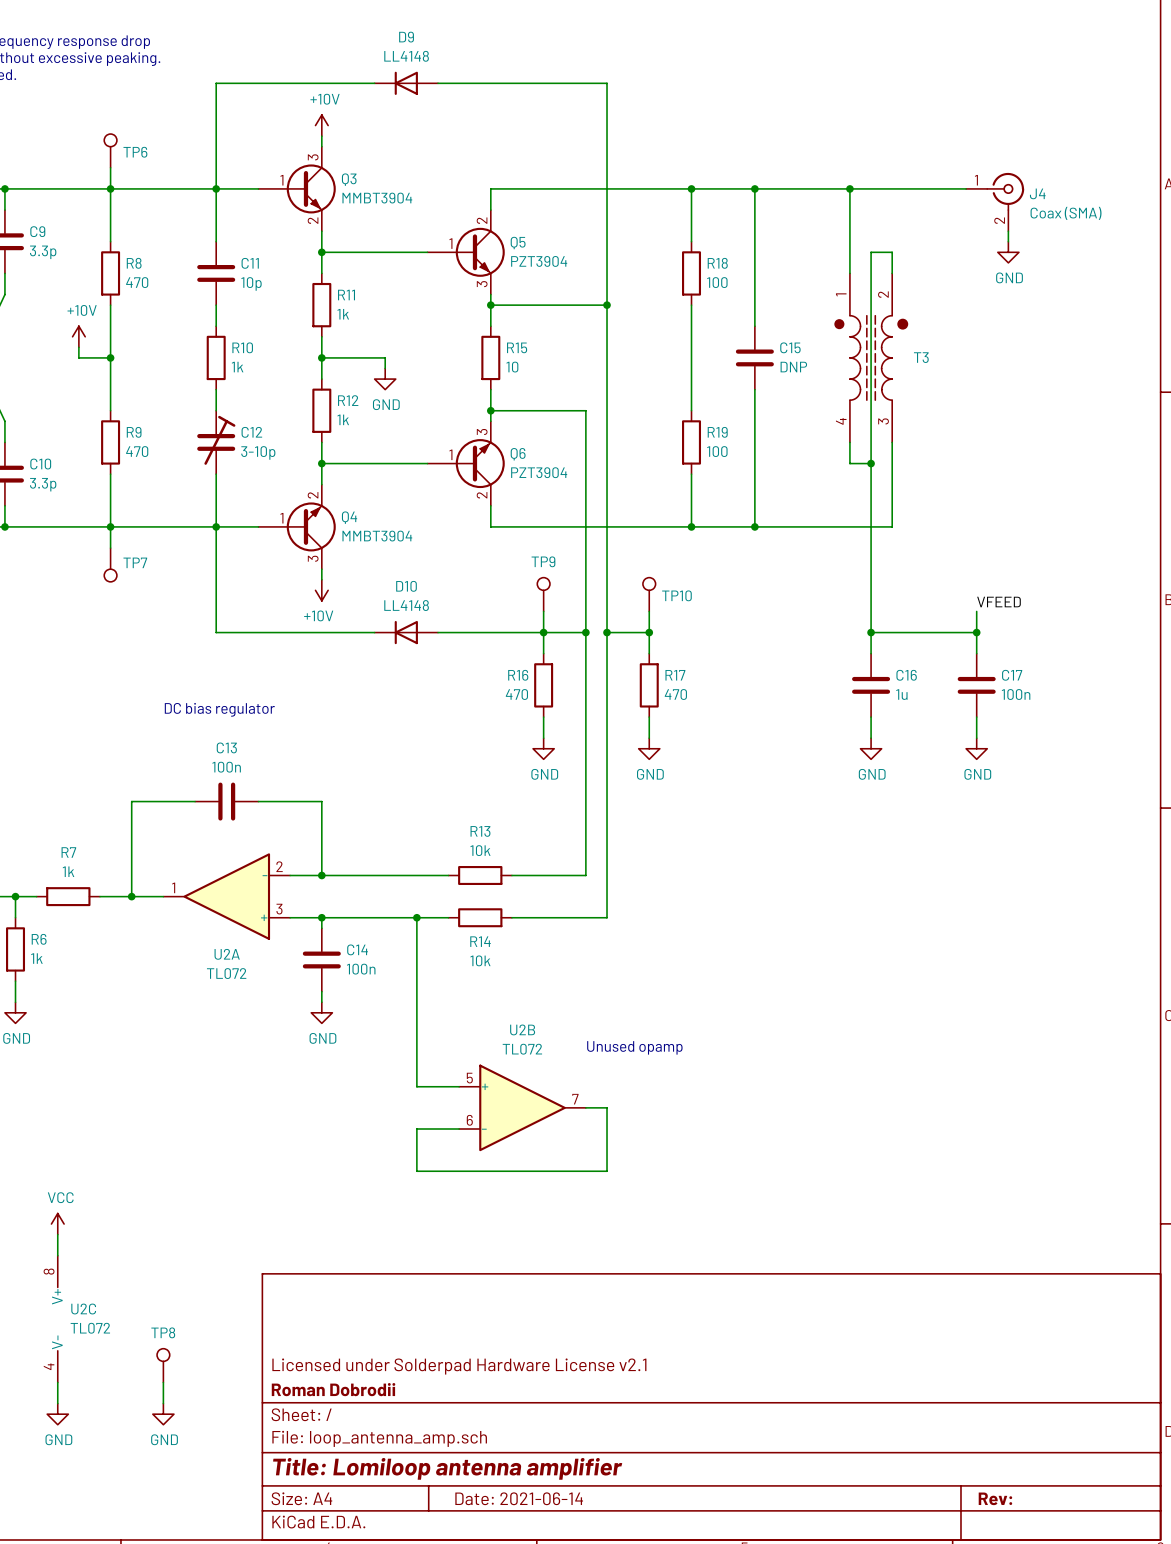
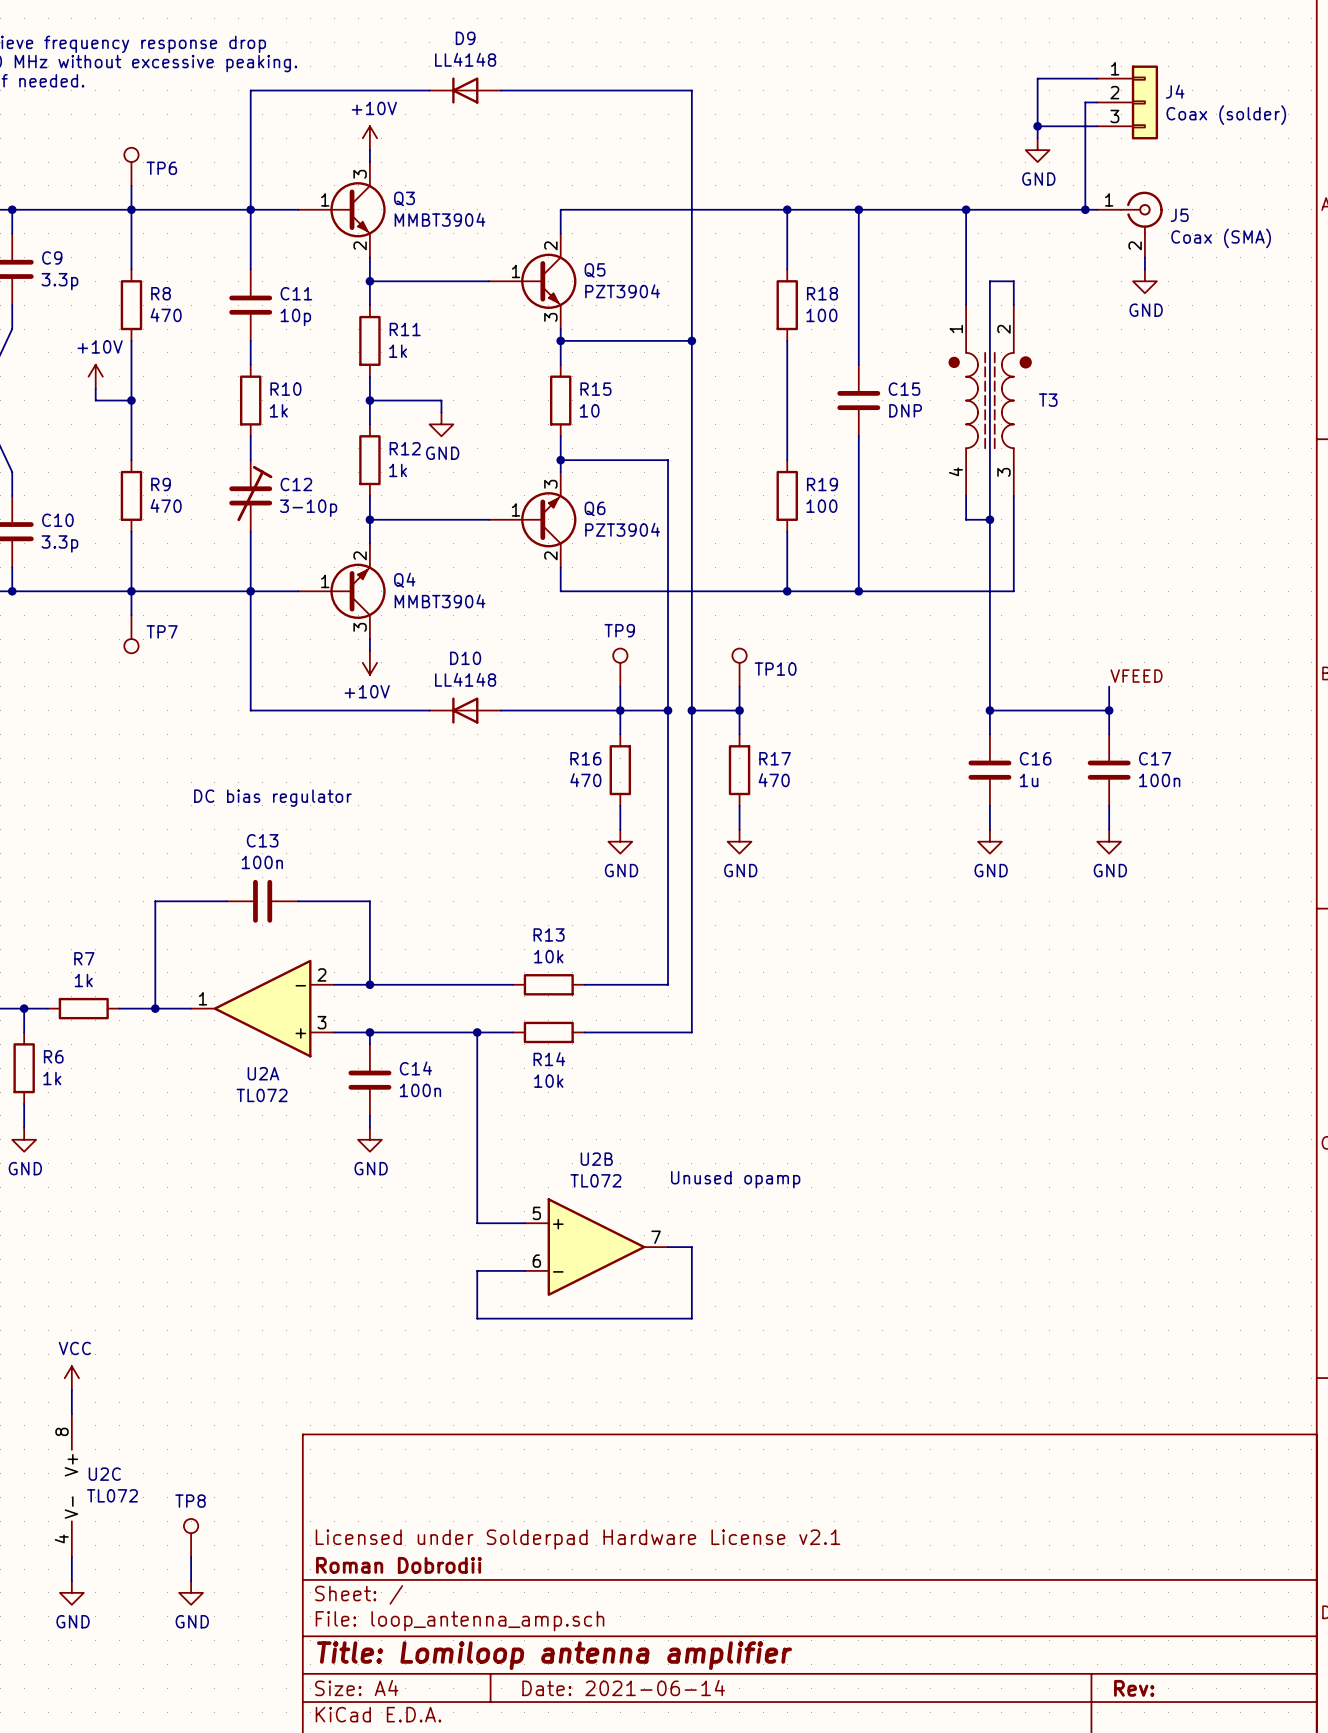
wire: none -> (1097, 78) (1037, 78) (1037, 138)
wire: none -> (1097, 102) (1085, 102) (1085, 209)
J4: none -> Coax (solder) (1127, 102)
wire: none -> (1037, 126) (1097, 126)
junction: none -> (1037, 126)
power symbol: none -> GND (1037, 150)
junction: none -> (1085, 209)
J4 name: J4 (1037, 193) -> J5 (1179, 215)

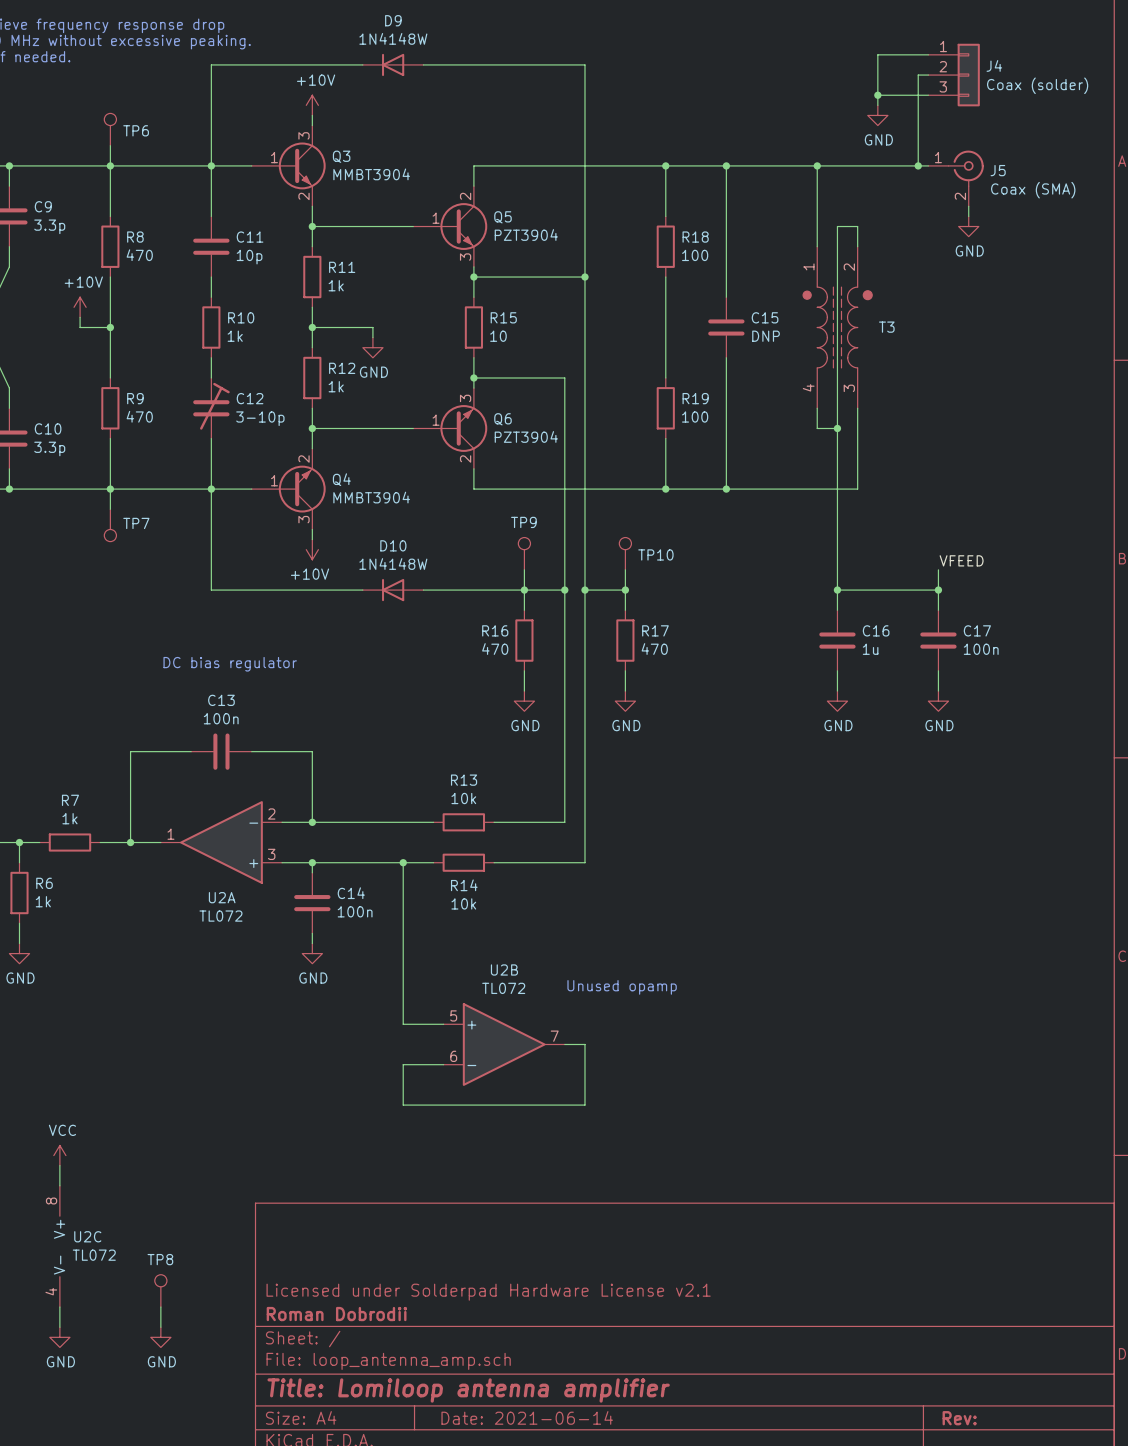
D9 value: LL4148 (465, 59) -> 1N4148W (393, 38)
D10 value: LL4148 (465, 679) -> 1N4148W (393, 563)

